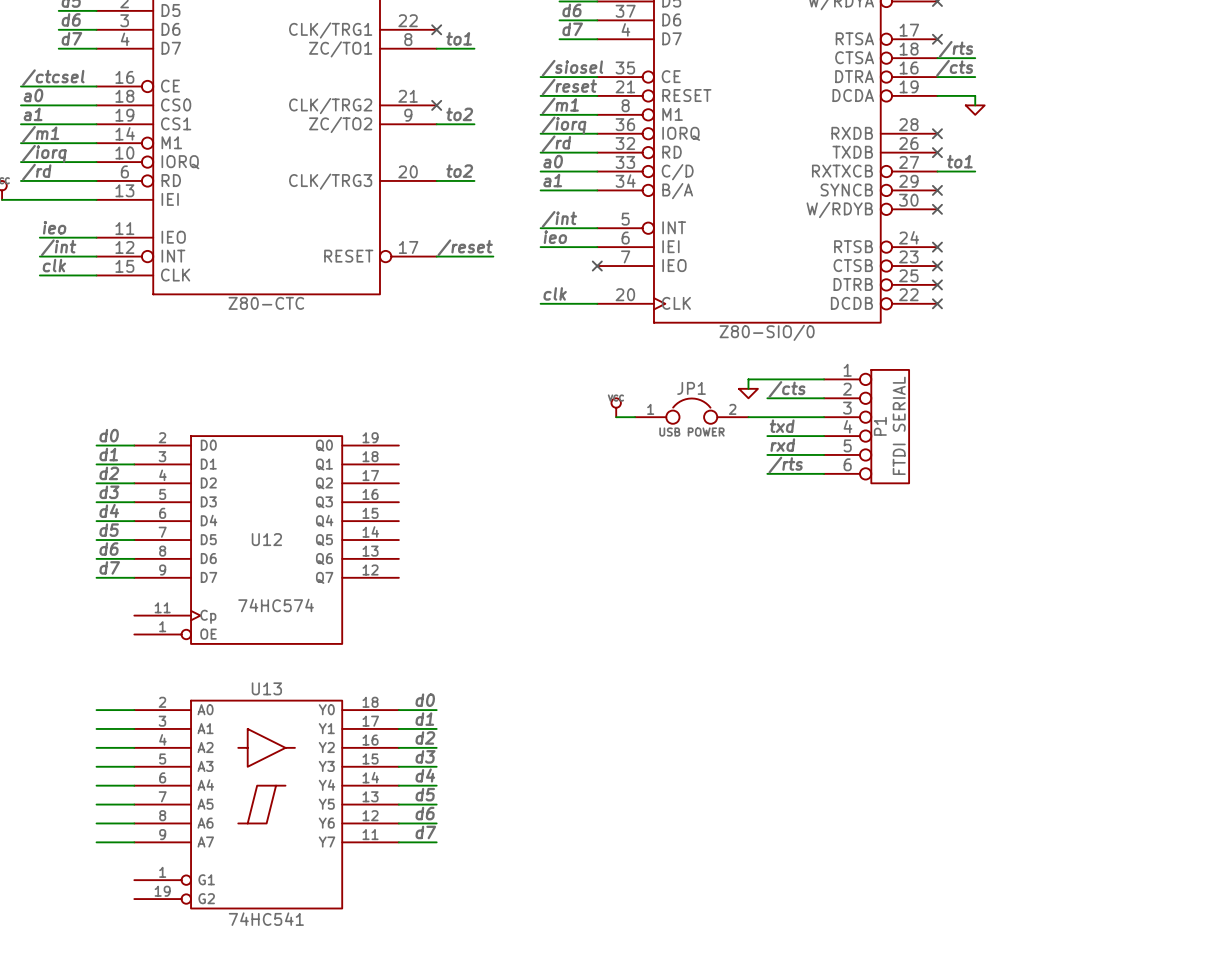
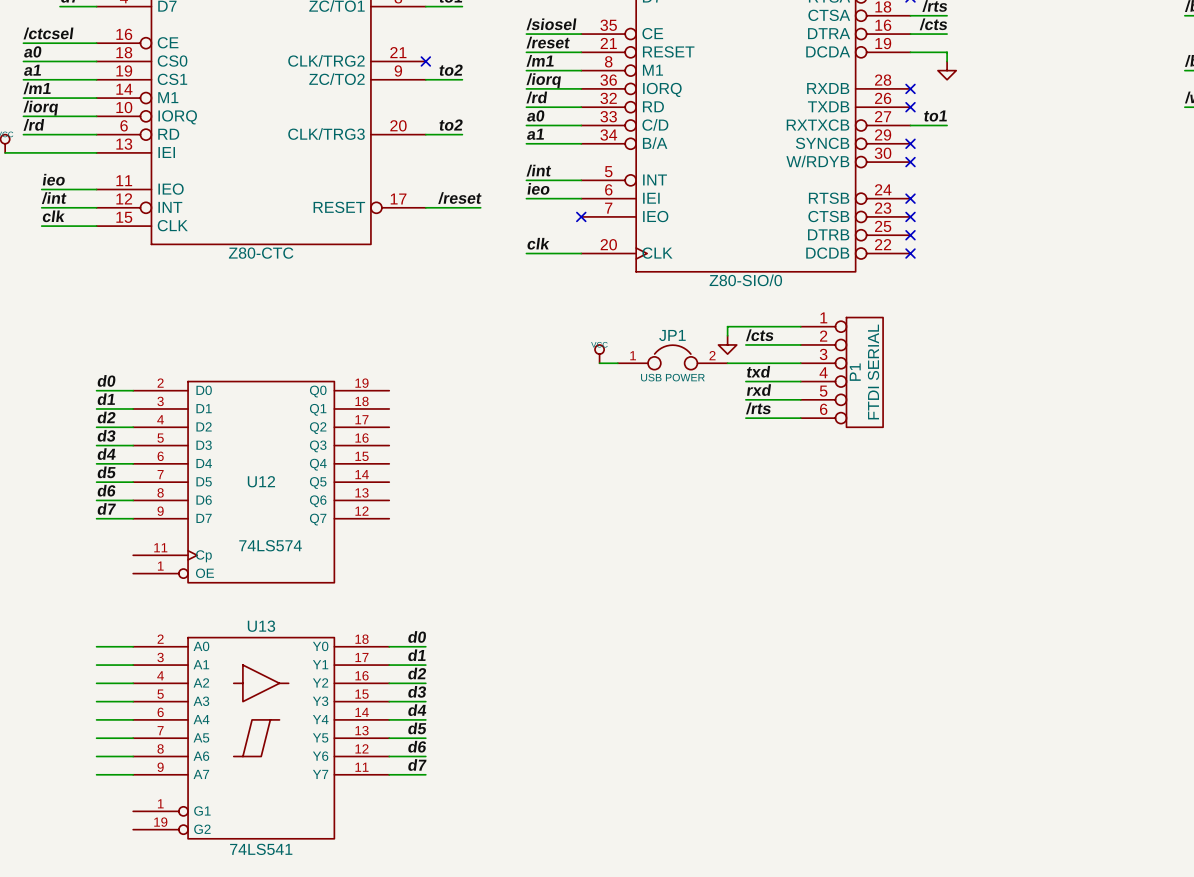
power symbol shape: [965, 105, 985, 115] -> [937, 61, 957, 80]
power symbol shape: [739, 388, 758, 399] -> [718, 335, 737, 355]
U12 value: 74HC574 (276, 605) -> 74LS574 (270, 545)
U13 value: 74HC541 (266, 919) -> 74LS541 (261, 849)

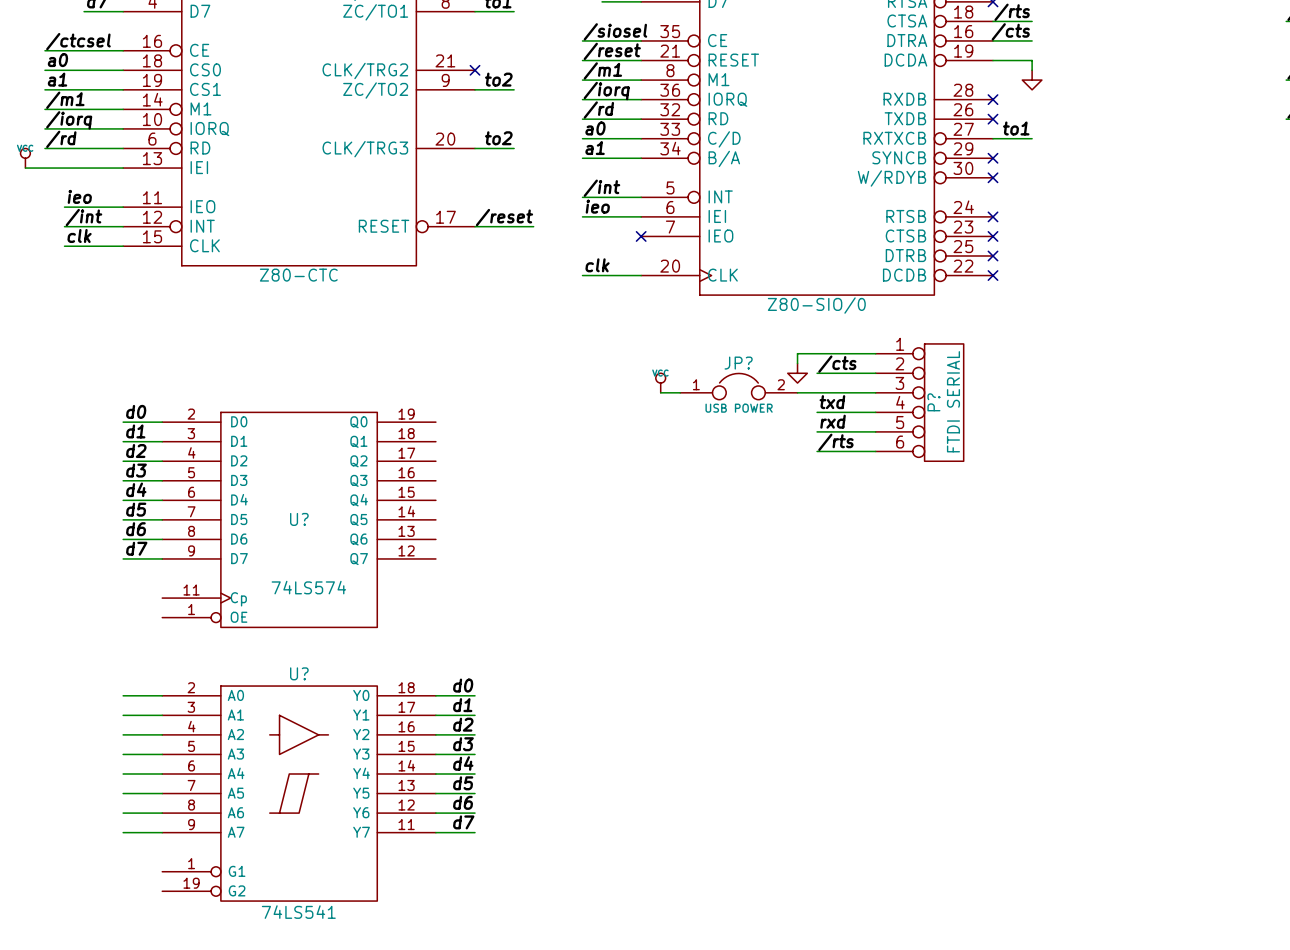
JP1 name: JP1 (672, 335) -> JP? (738, 363)
P1 name: P1 (855, 372) -> P? (933, 402)
U12 name: U12 (261, 481) -> U? (299, 519)
U13 name: U13 (261, 626) -> U? (299, 673)

